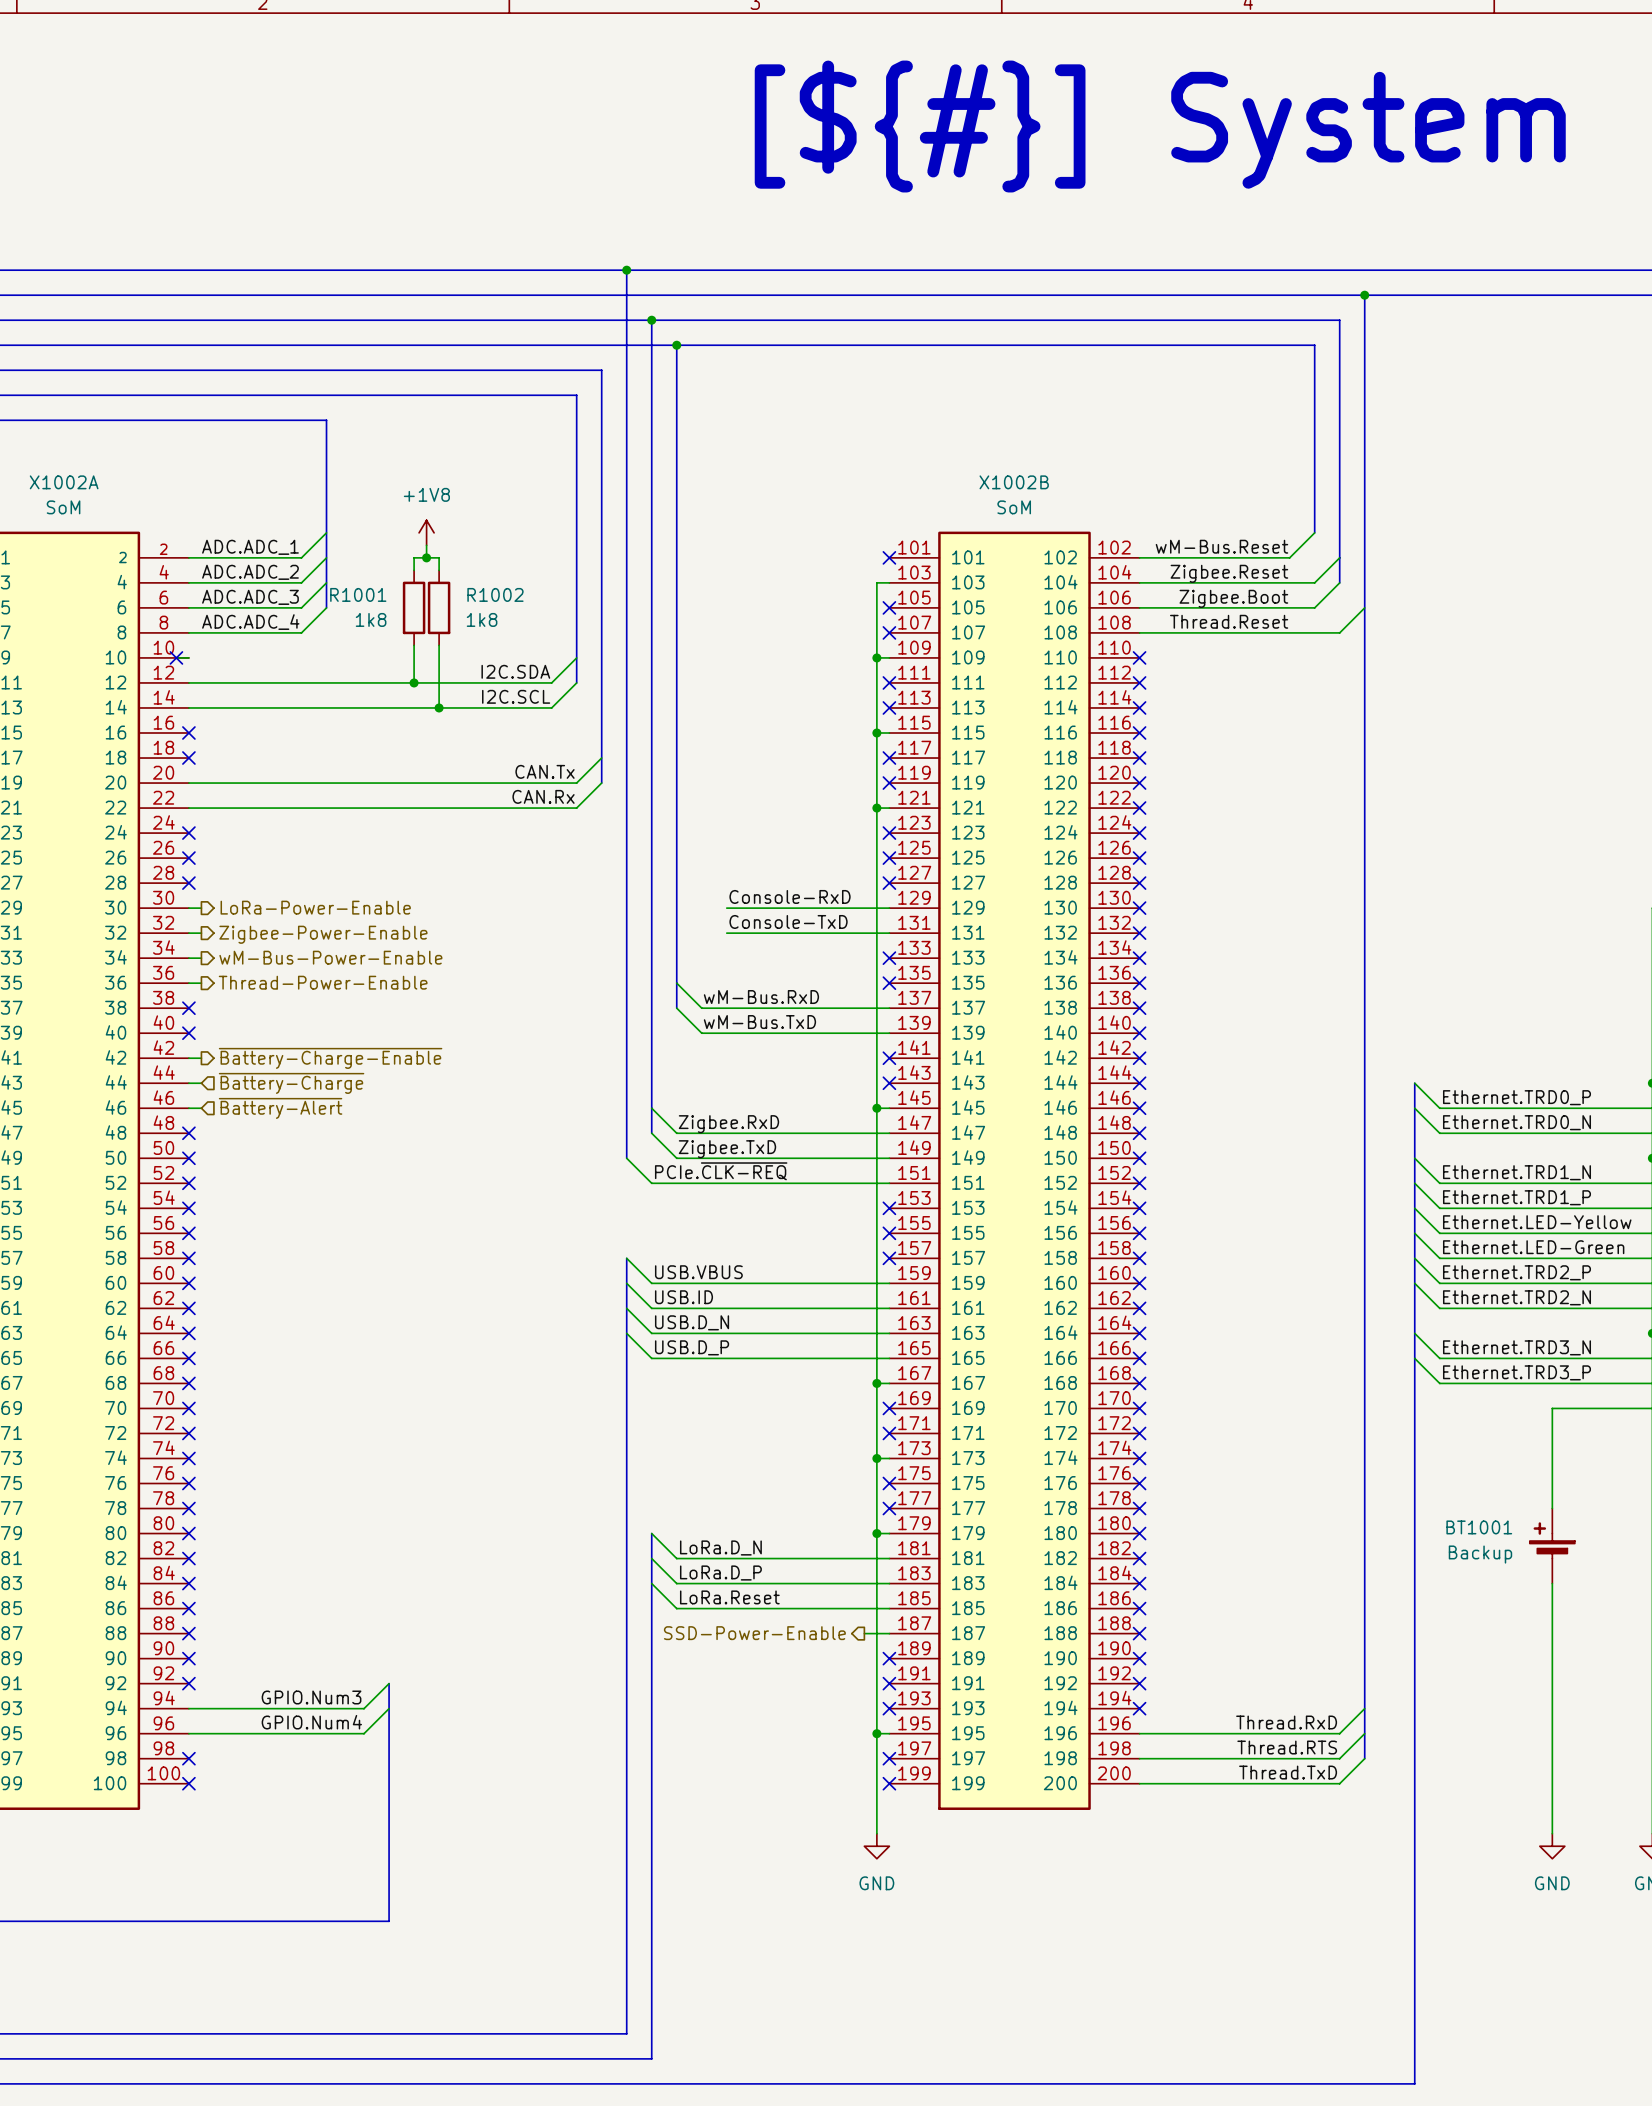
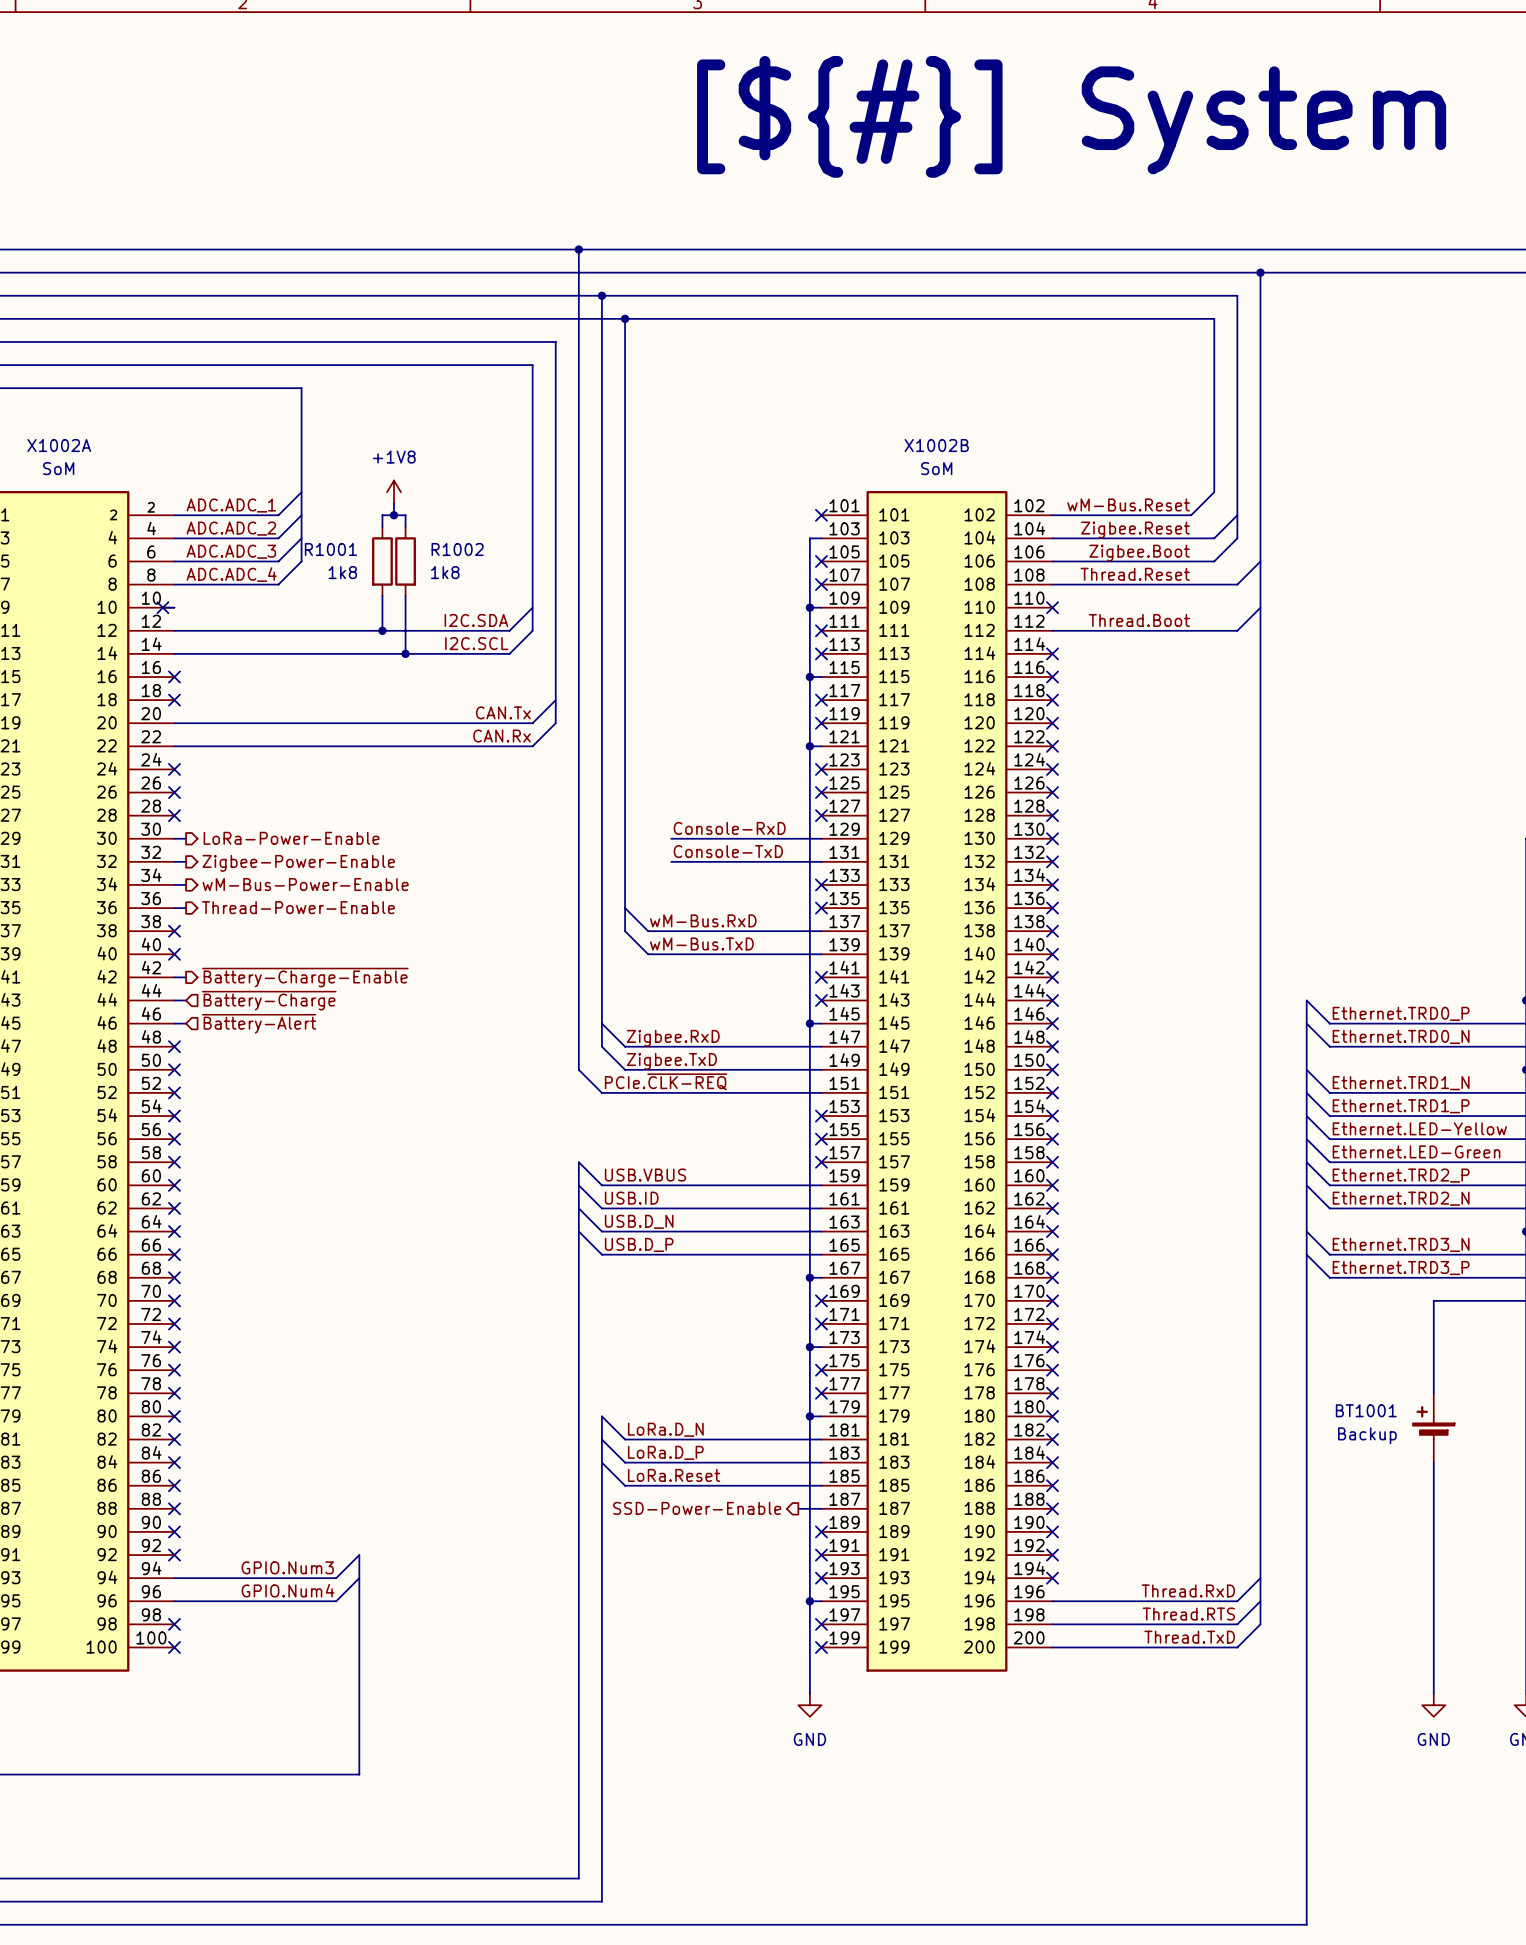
wire: none -> (1260, 607) (1237, 630) (1052, 630)
label: none -> Thread.Boot (1139, 620)
no-connect mark: (1139, 682) -> none

